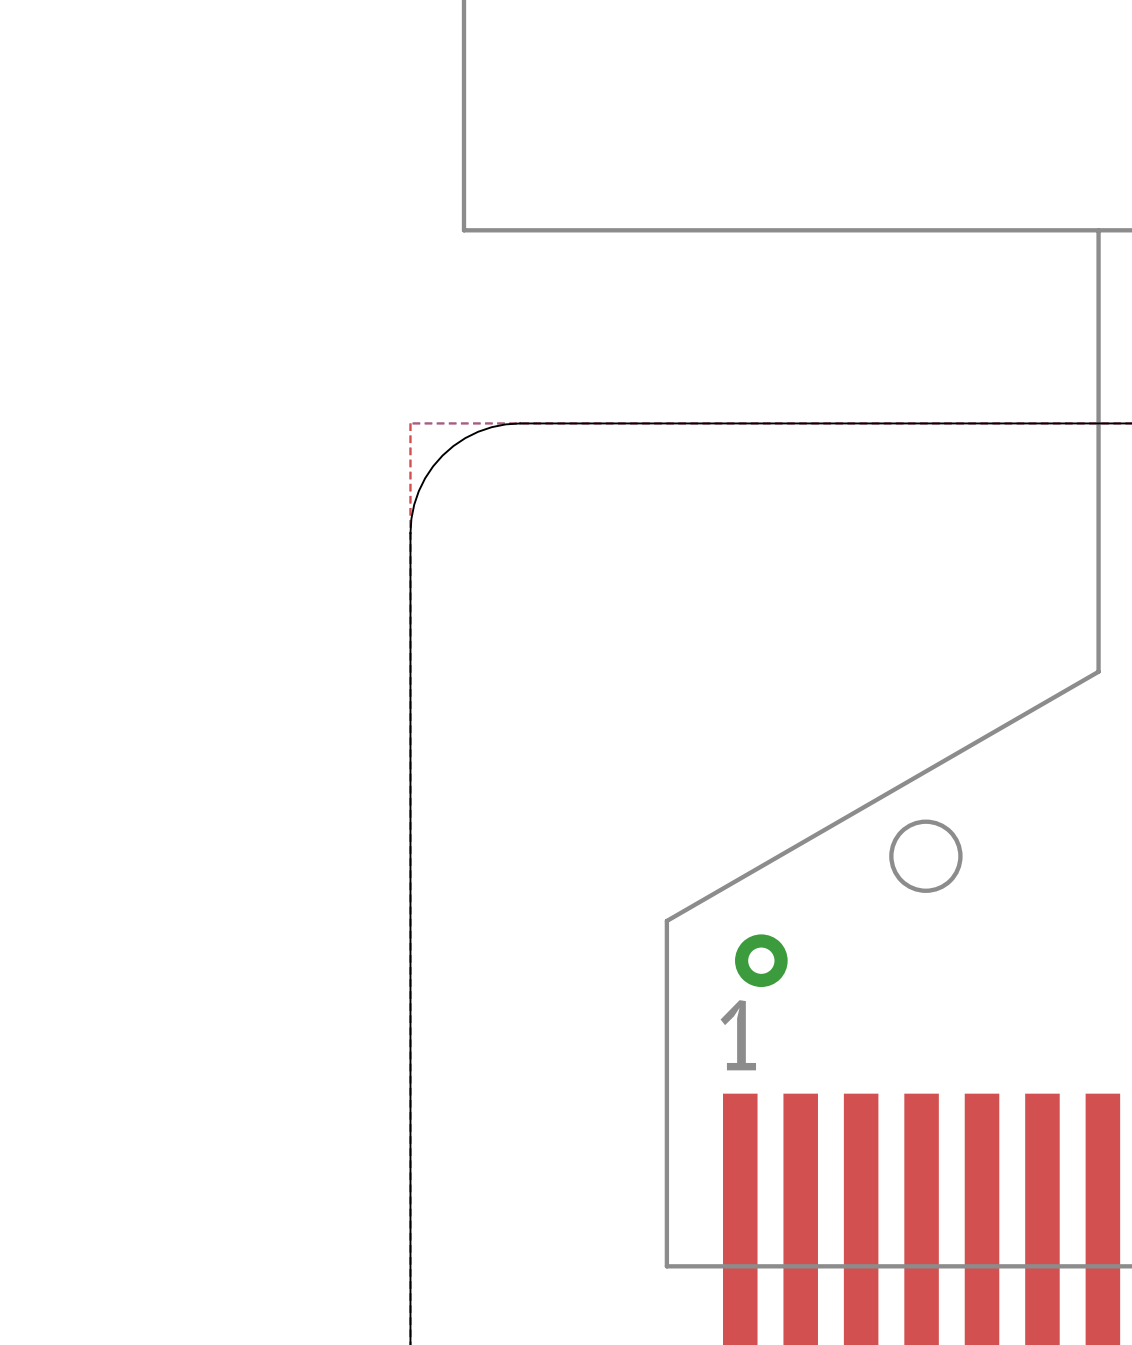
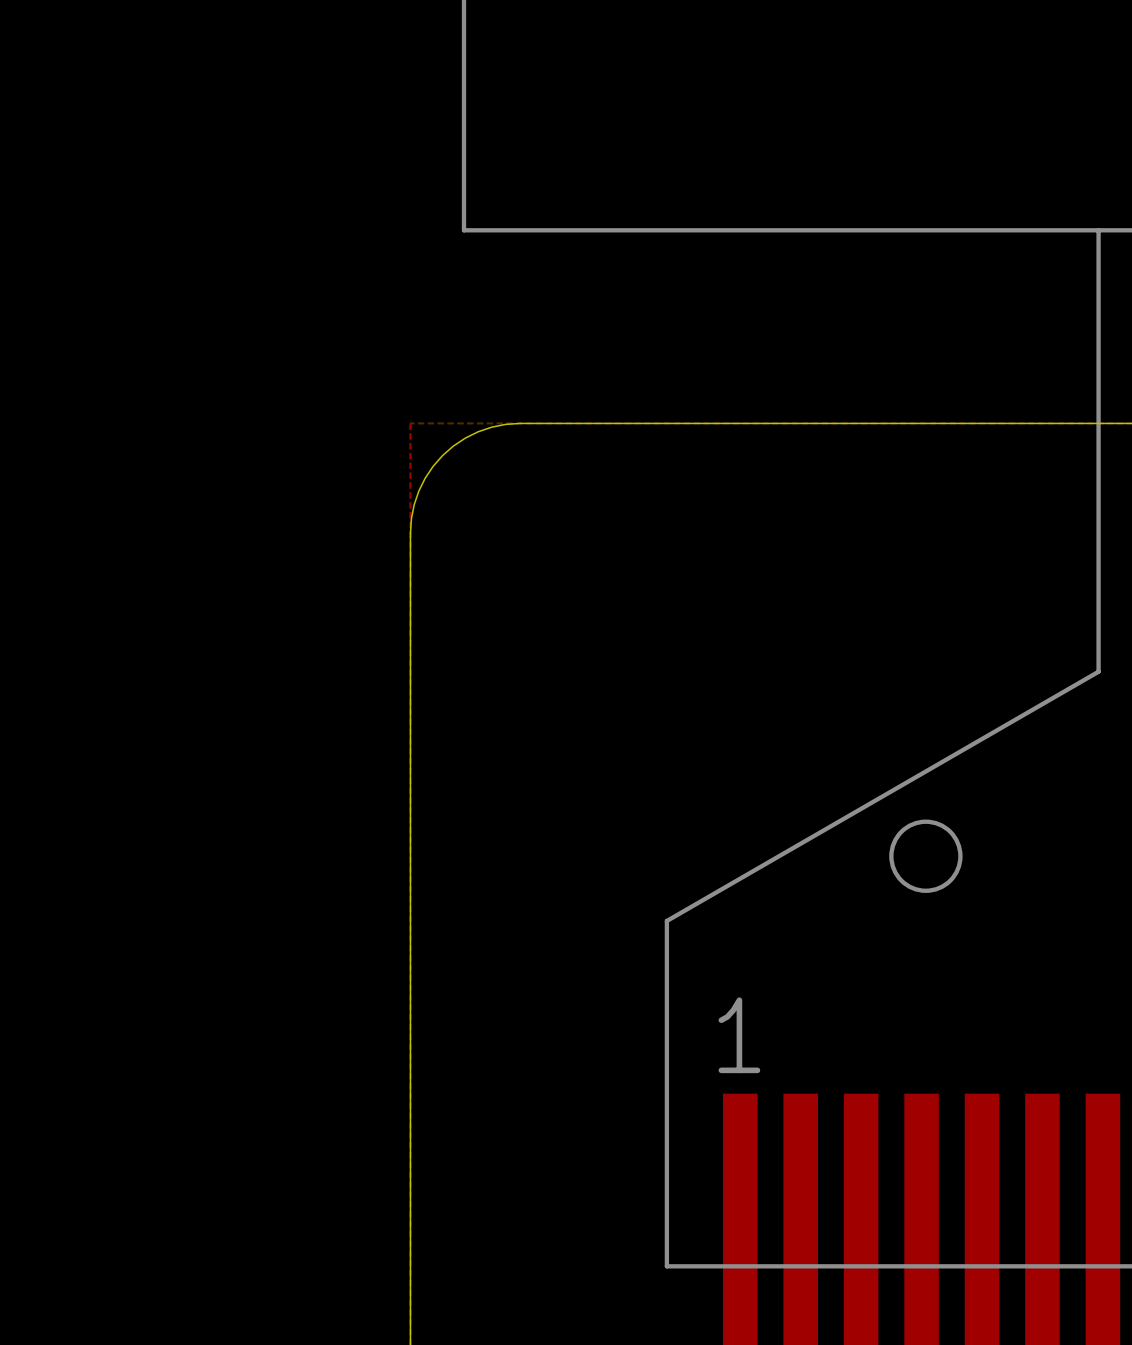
via: (761, 960) -> none

